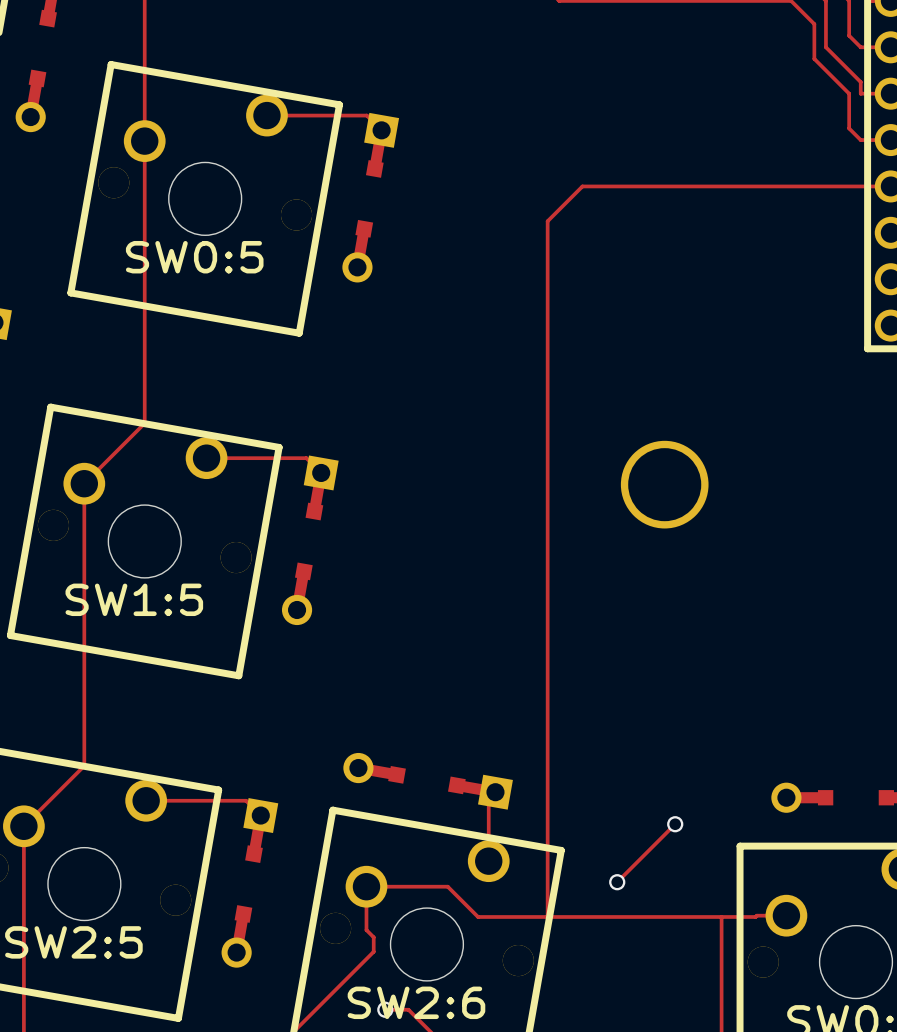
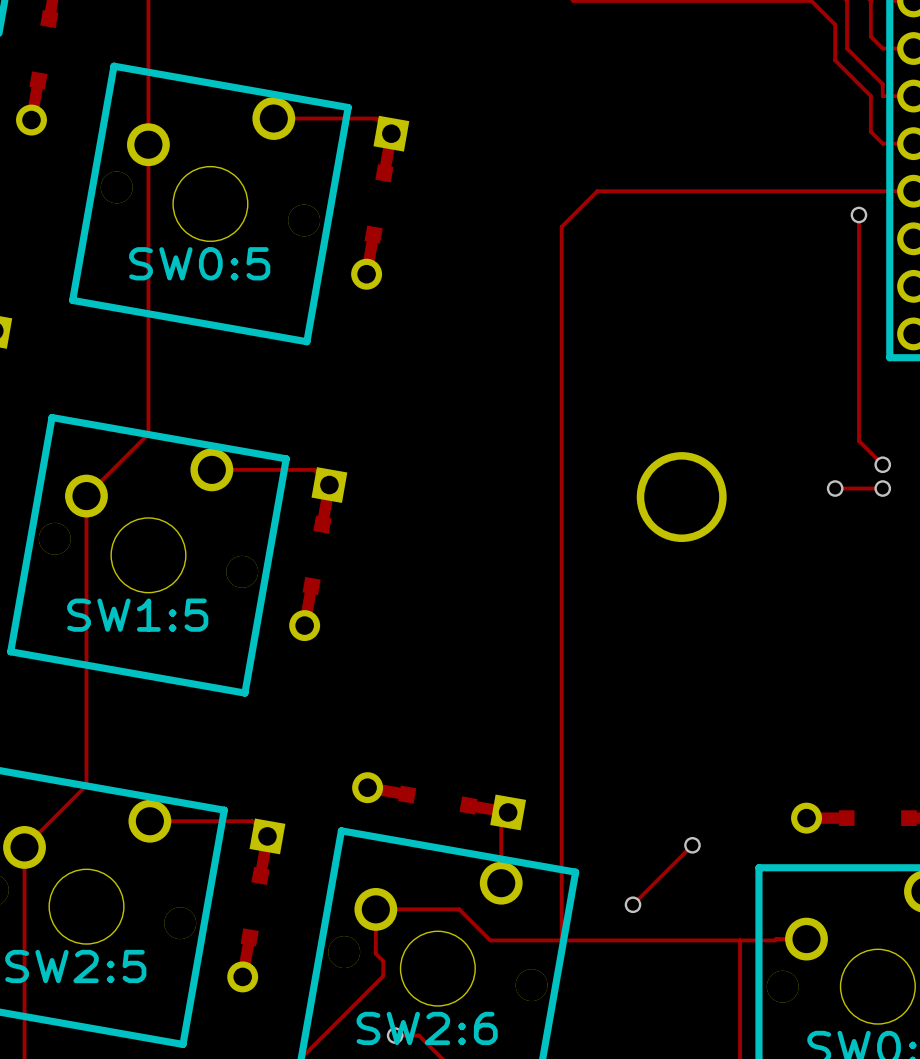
track: none -> (858, 215) (858, 440) (882, 464)
via: none -> (858, 215)
via: none -> (882, 464)
track: none -> (835, 488) (882, 488)
via: none -> (835, 488)
via: none -> (882, 488)

